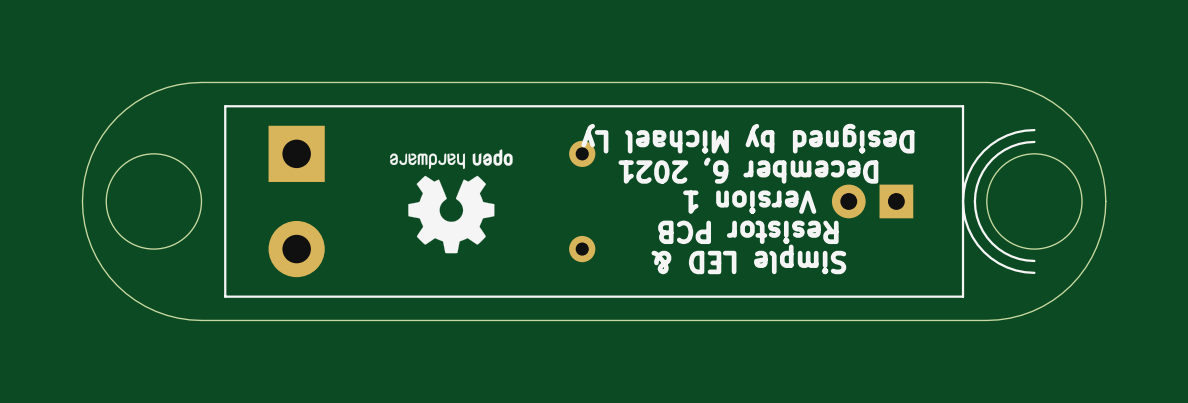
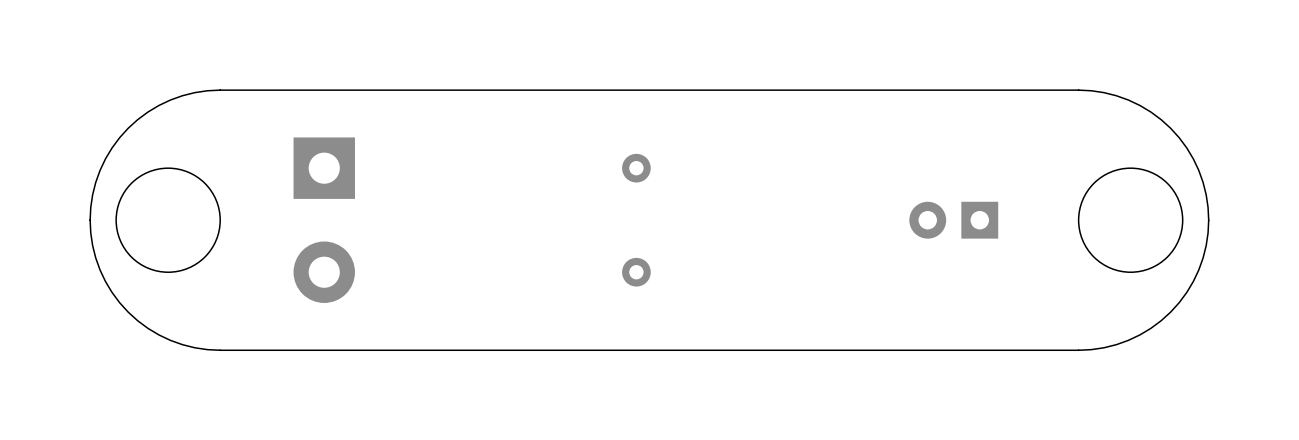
line: (963, 106) (963, 296) (225, 296) (225, 106) (963, 106) -> none
line: (1034, 130) (1007, 135) (983, 150) (968, 174) (963, 201) (968, 228) (983, 251) (1007, 267) (1034, 272) -> none
text: Designed by Michael Ly (747, 138) -> none
line: (1034, 141) (1011, 146) (992, 159) (979, 178) (974, 201) -> none
drawing: [390, 149, 513, 254] -> none
text: December 6, 2021 (748, 170) -> none
line: (974, 201) (979, 224) (992, 243) (1011, 256) (1034, 260) -> none
text: Version 1 (749, 202) -> none
text: Resistor PCB (748, 232) -> none
text: Simple LED & (748, 259) -> none

